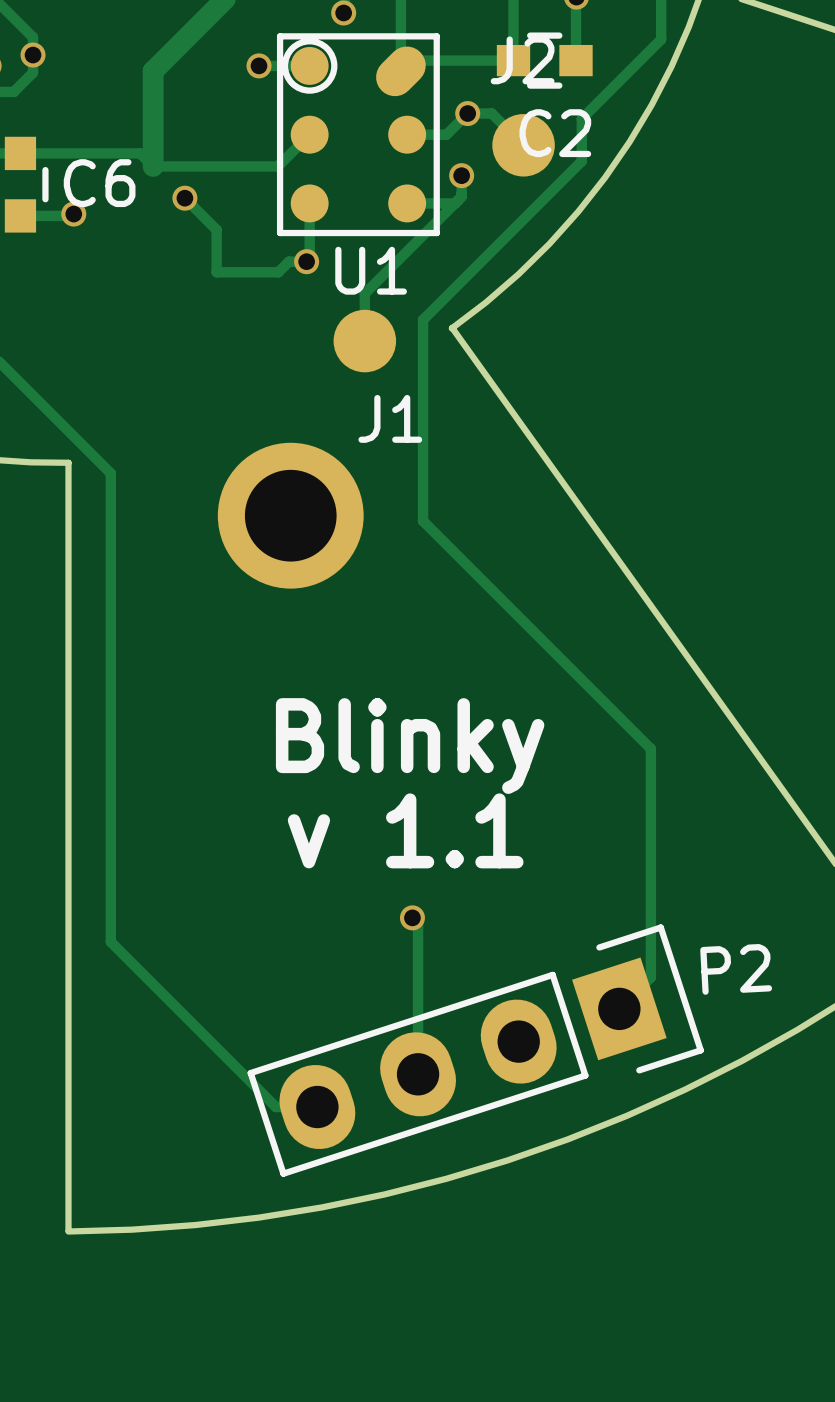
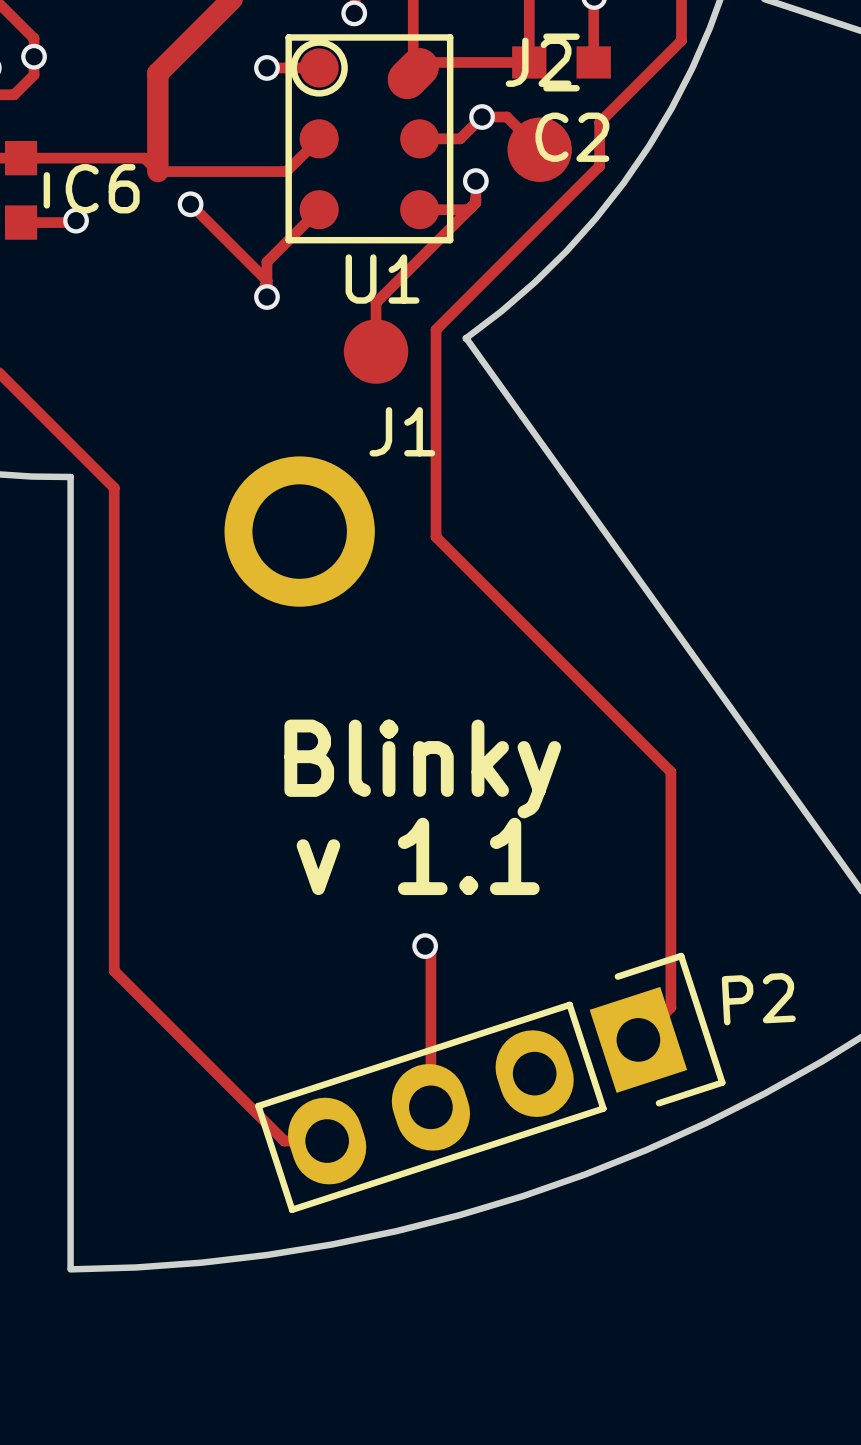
track: (309, 203) (309, 258) (306, 261) (288, 261) (278, 272) (216, 272) (216, 229) -> (319, 209) (266, 261) (266, 284) (264, 286) (264, 295) (266, 297)
track: none -> (223, 237) (266, 280)
via position: (306, 261) -> (266, 297)

